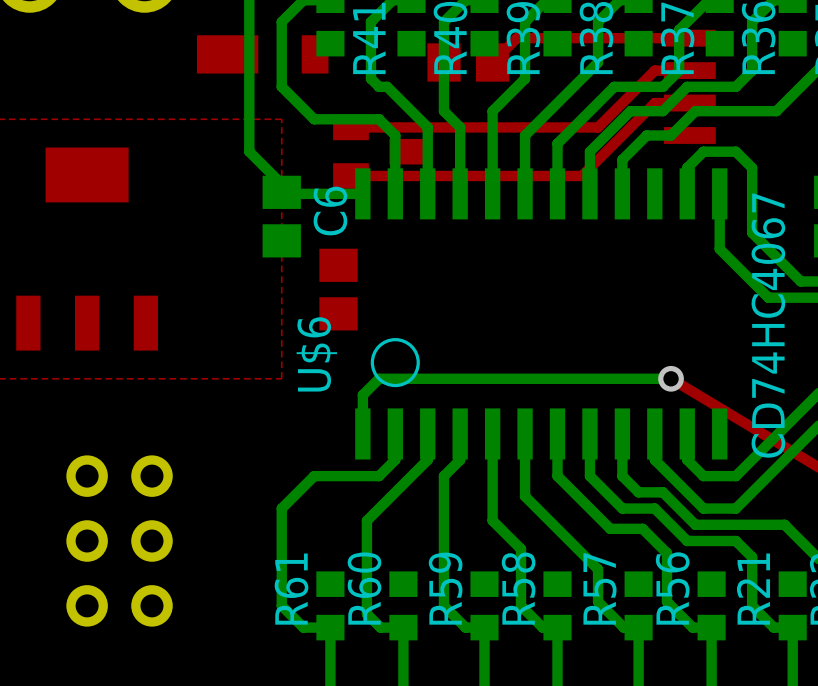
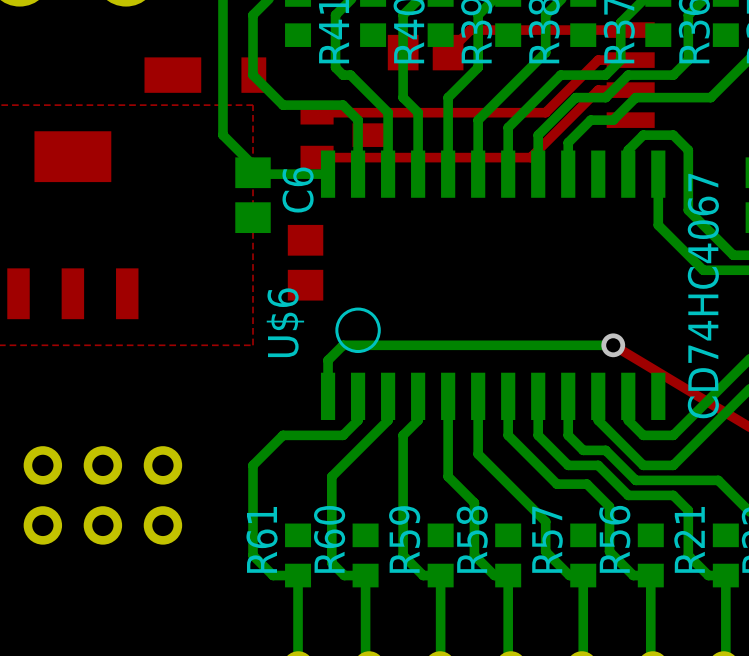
part position: (262, 54) -> (205, 75)
part rotation: 0° (119, 541) -> 90° clockwise (102, 495)

